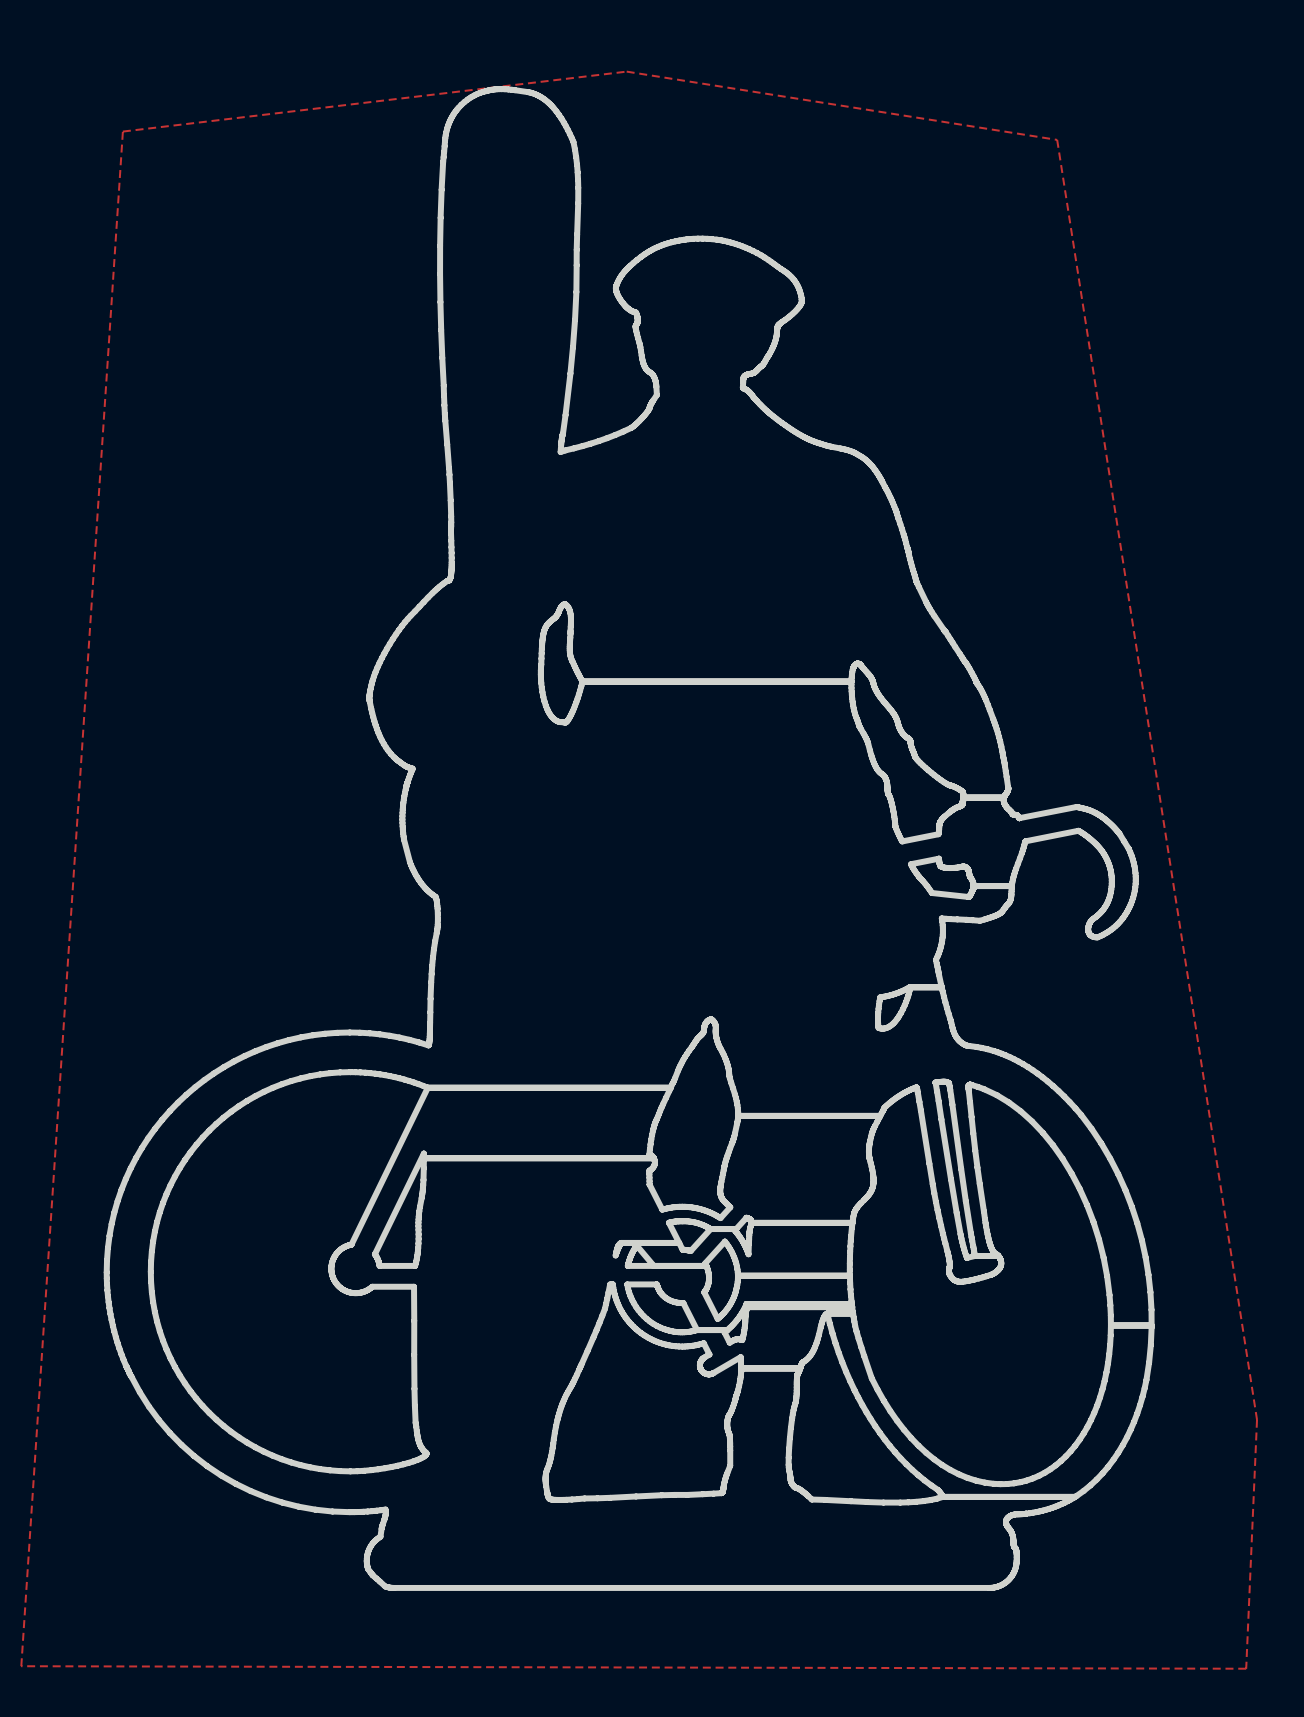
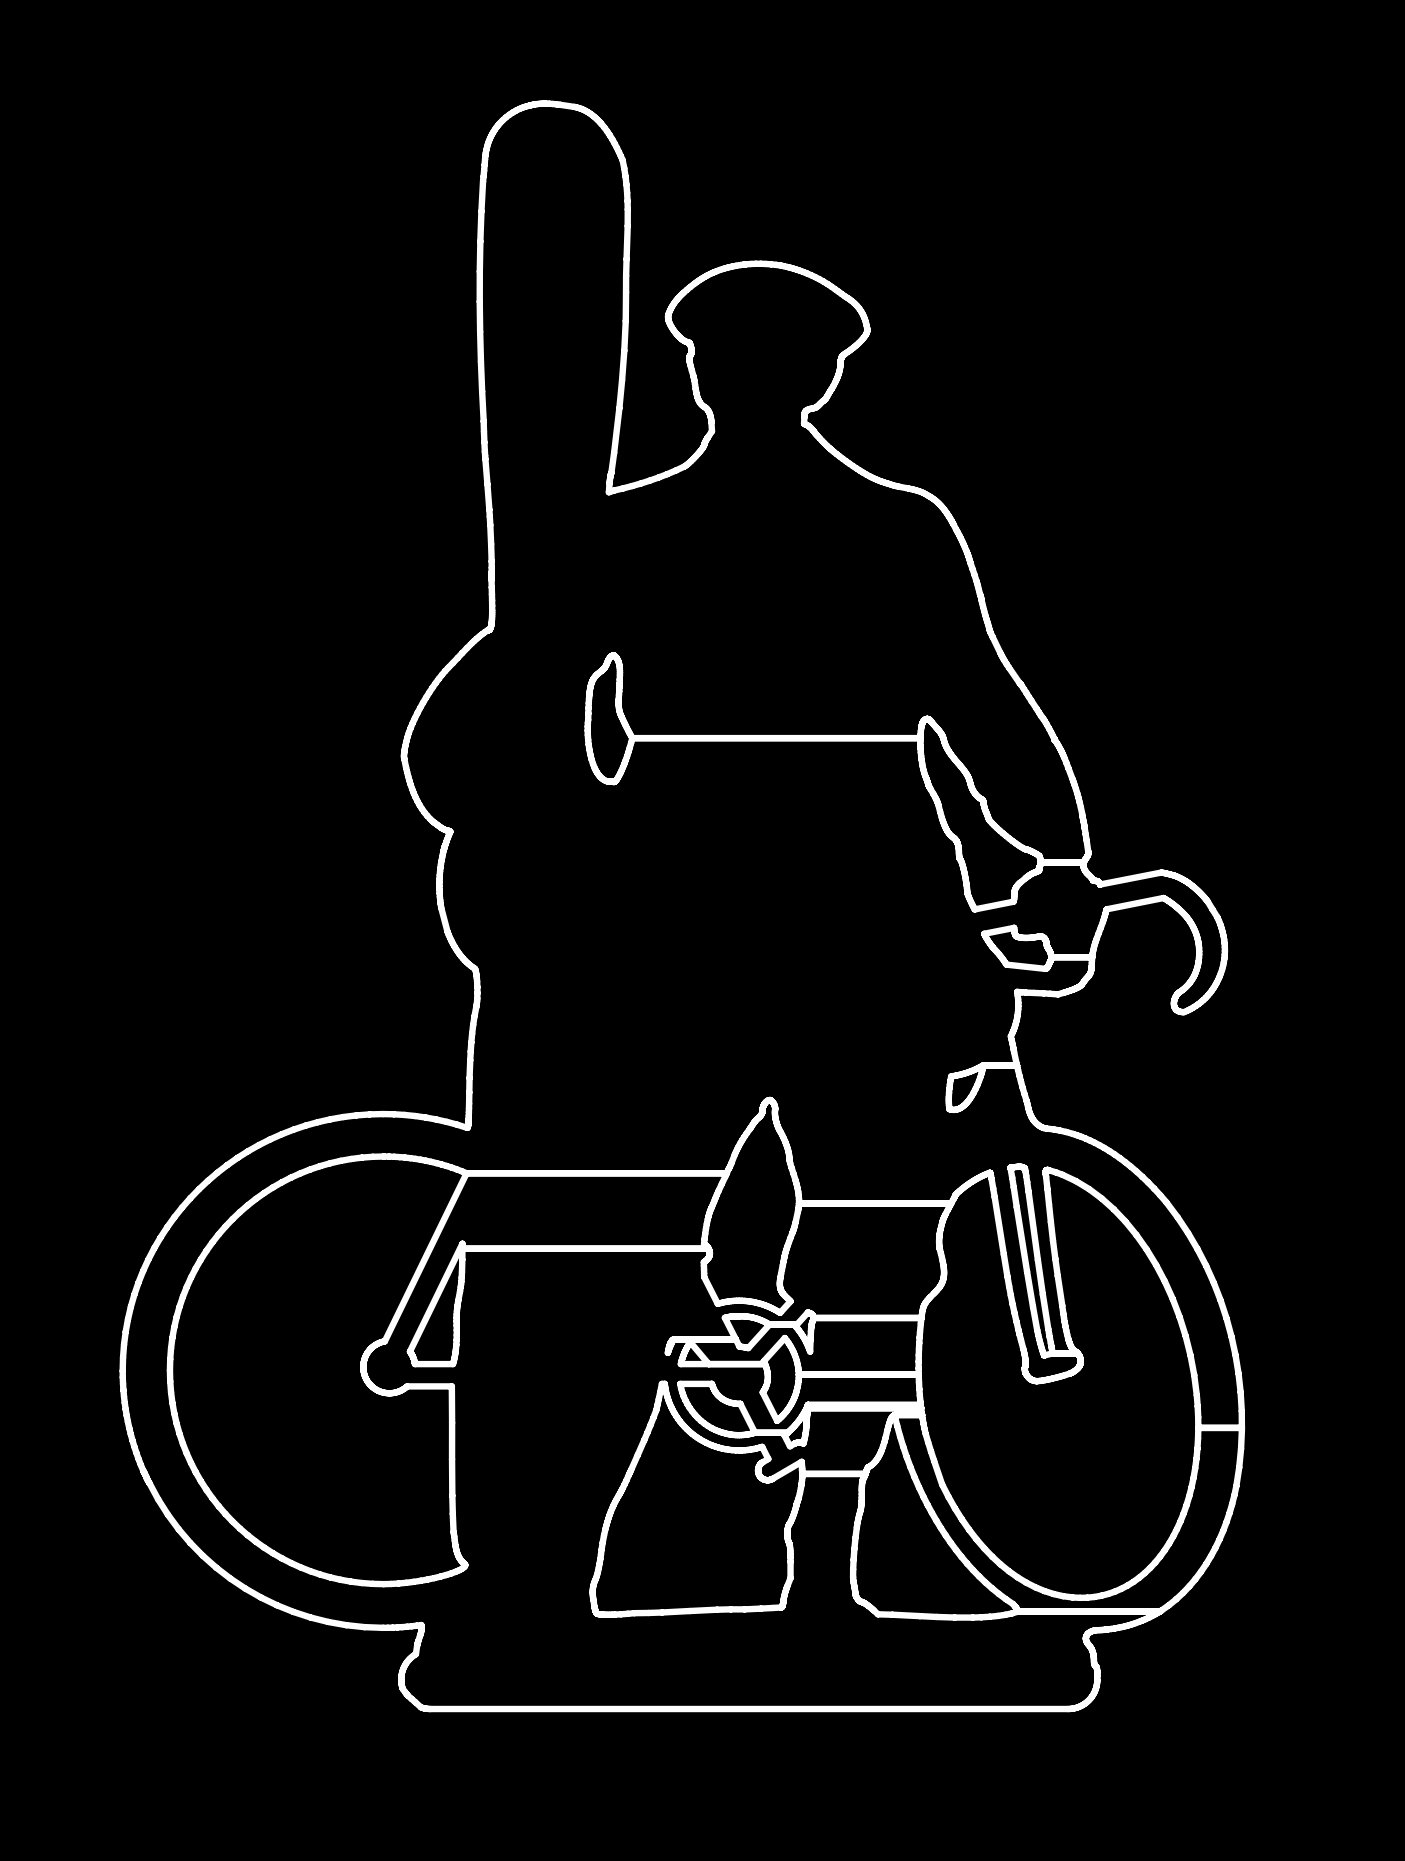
top zone outline: (626, 71) (122, 131) (21, 1666) (1246, 1668) (1257, 1419) (1057, 139) (626, 71) -> none

